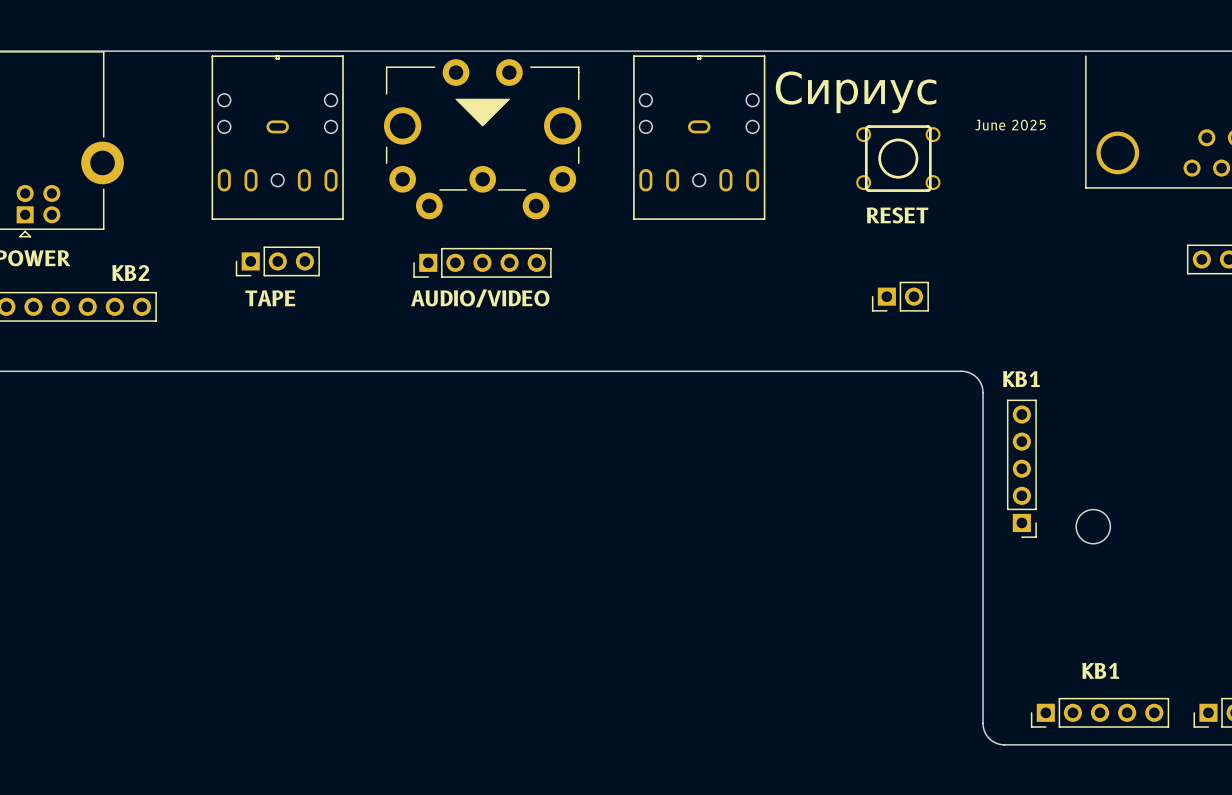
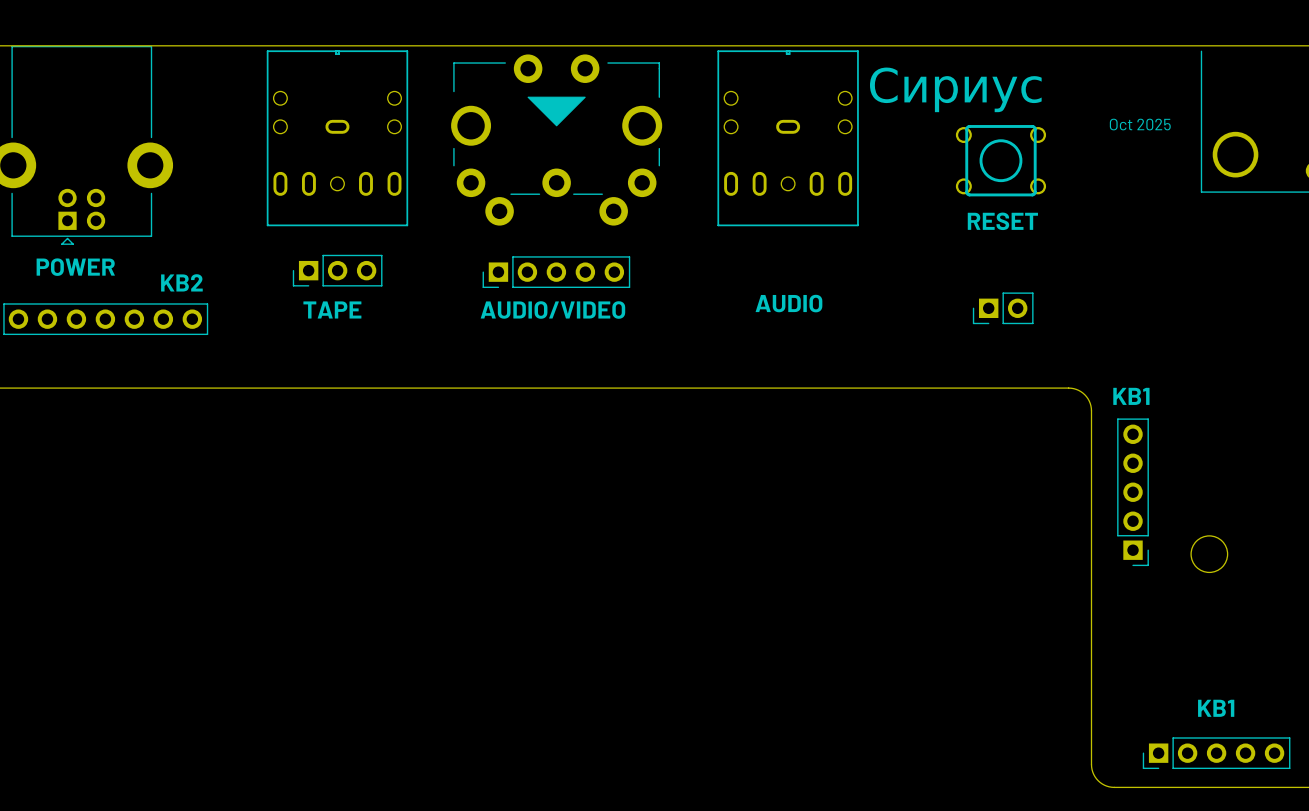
text: none -> Oct 2025 (1140, 124)
text: June 2025 (1010, 125) -> none
text: none -> AUDIO (788, 303)

